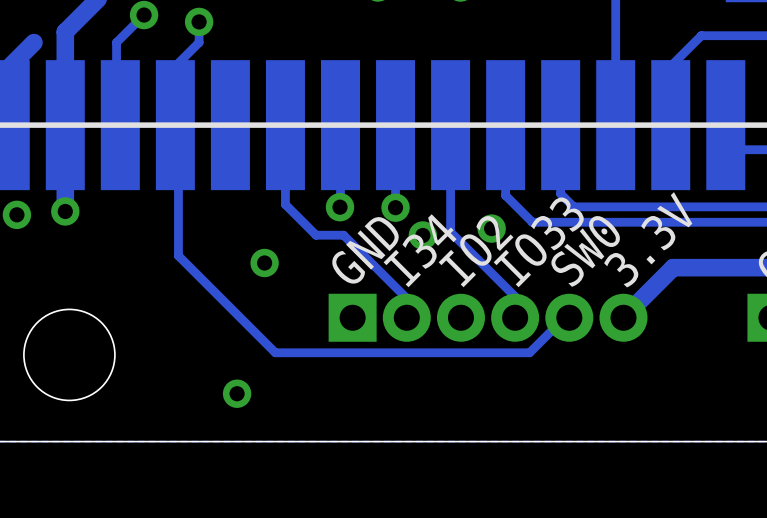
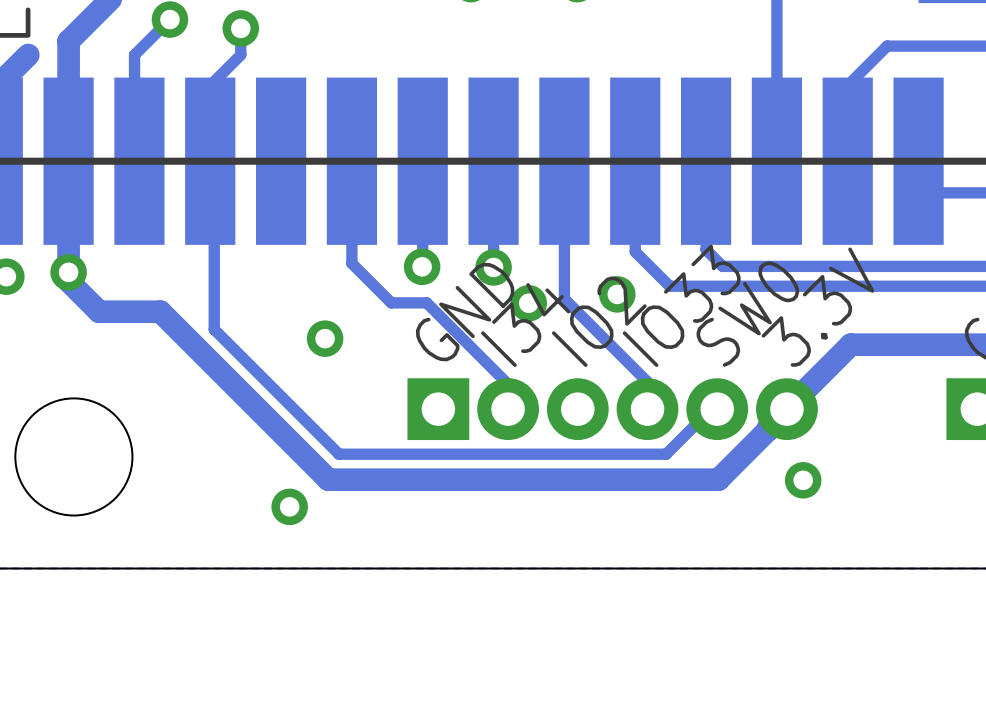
track: none -> (68, 272) (68, 281) (99, 311) (160, 311) (328, 479) (718, 479) (786, 408)
via: none -> (803, 480)

